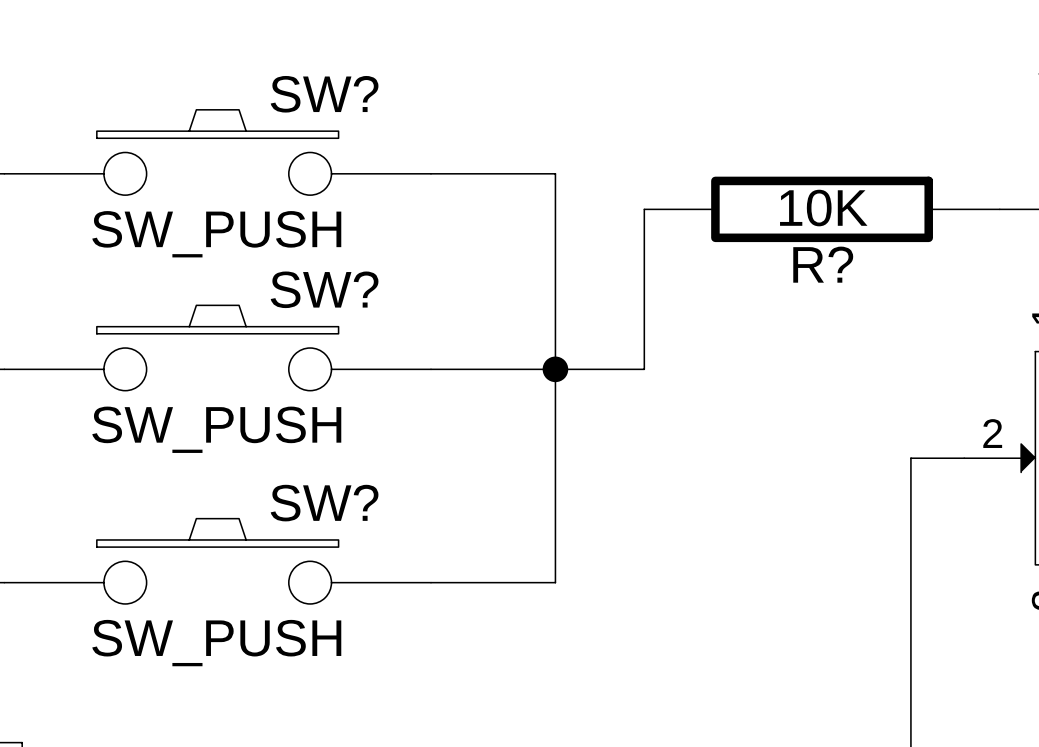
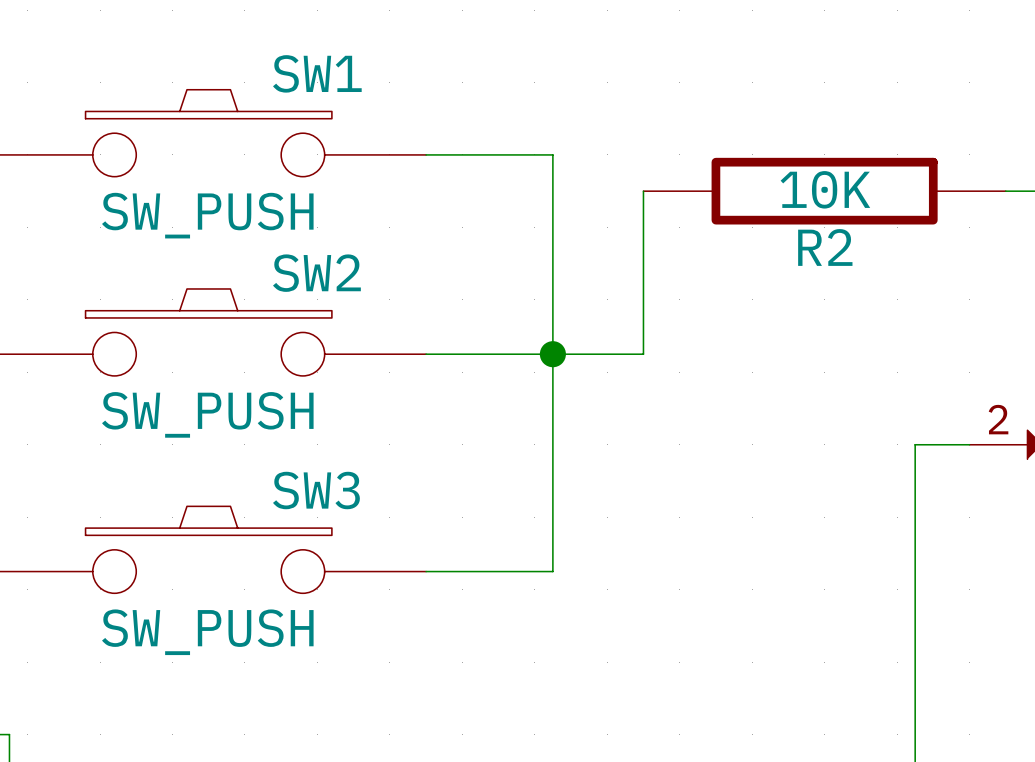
SW? name: SW? (324, 94) -> SW1 (317, 73)
R? name: R? (823, 264) -> R2 (825, 247)
SW? name: SW? (324, 289) -> SW2 (316, 273)
SW? name: SW? (324, 503) -> SW3 (316, 490)

